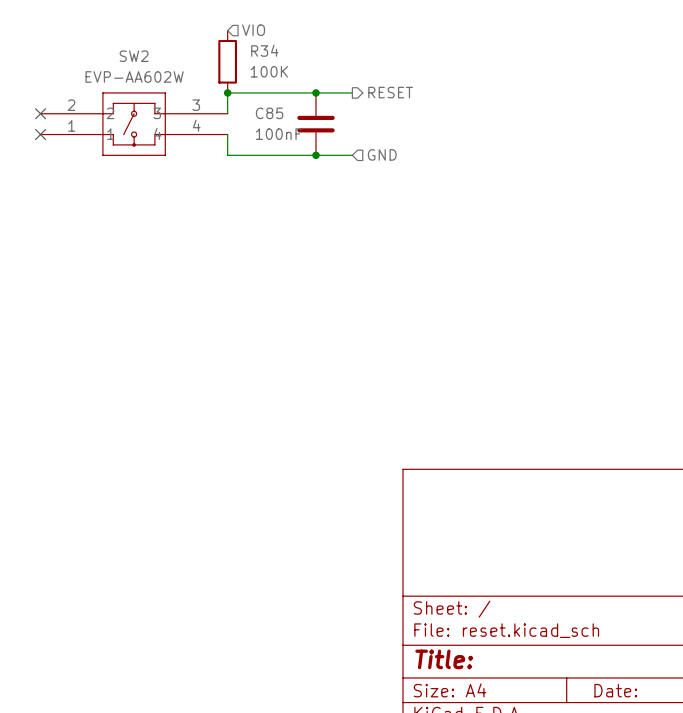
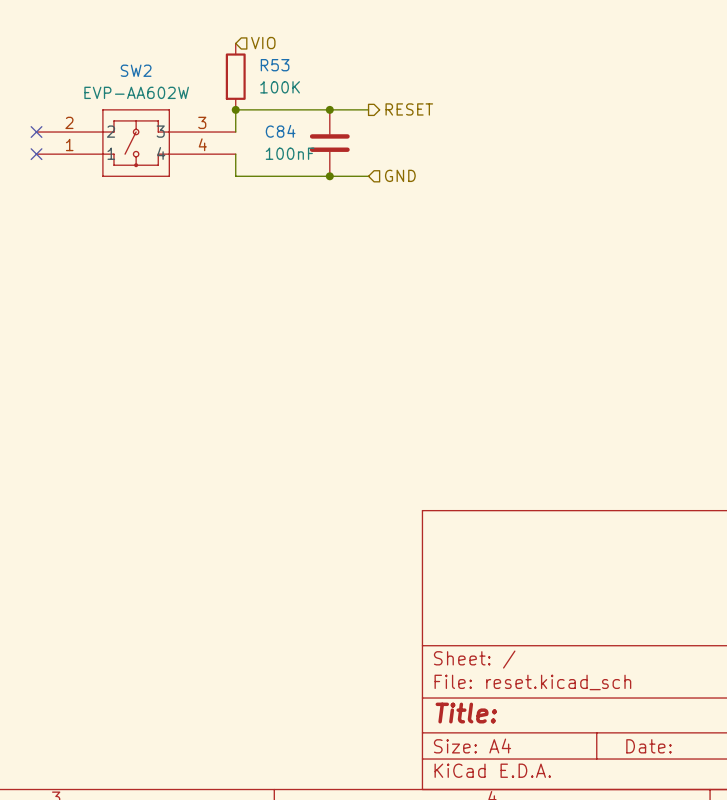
R34 name: R34 (264, 50) -> R53 (275, 65)
C85 name: C85 (269, 113) -> C84 (280, 131)

